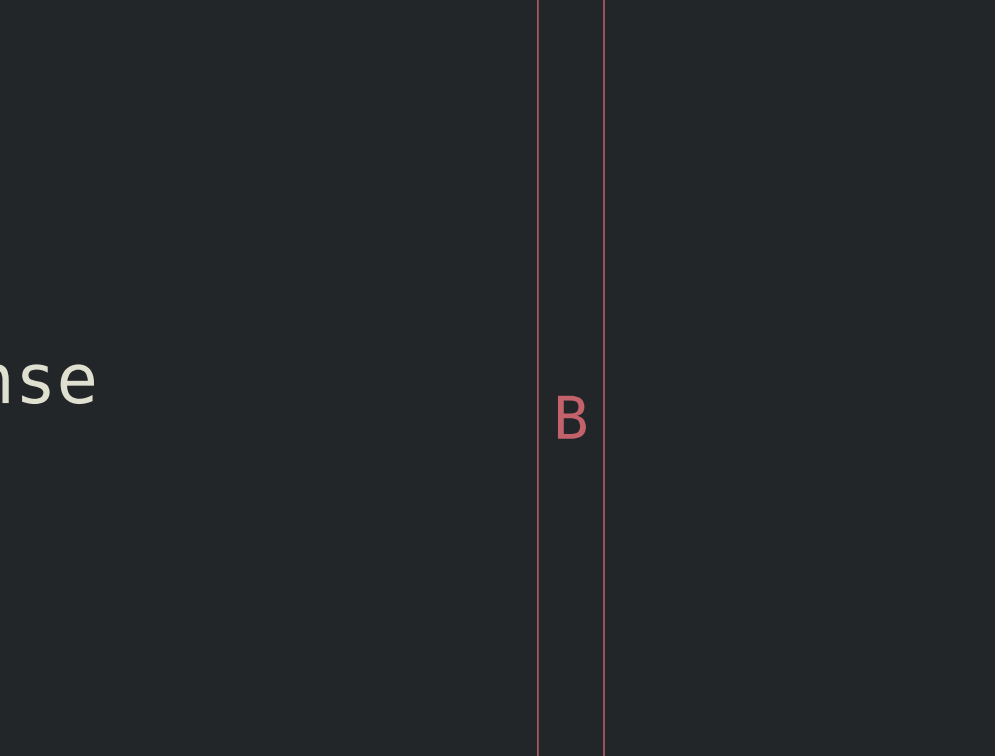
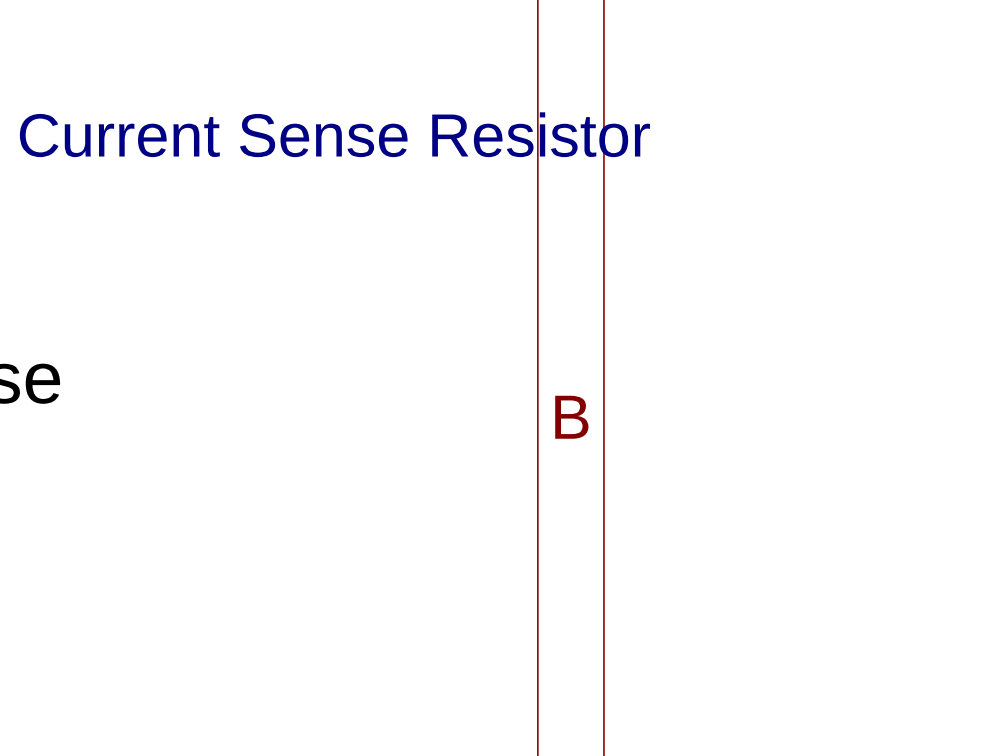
text: none -> Current Sense Resistor (334, 134)

